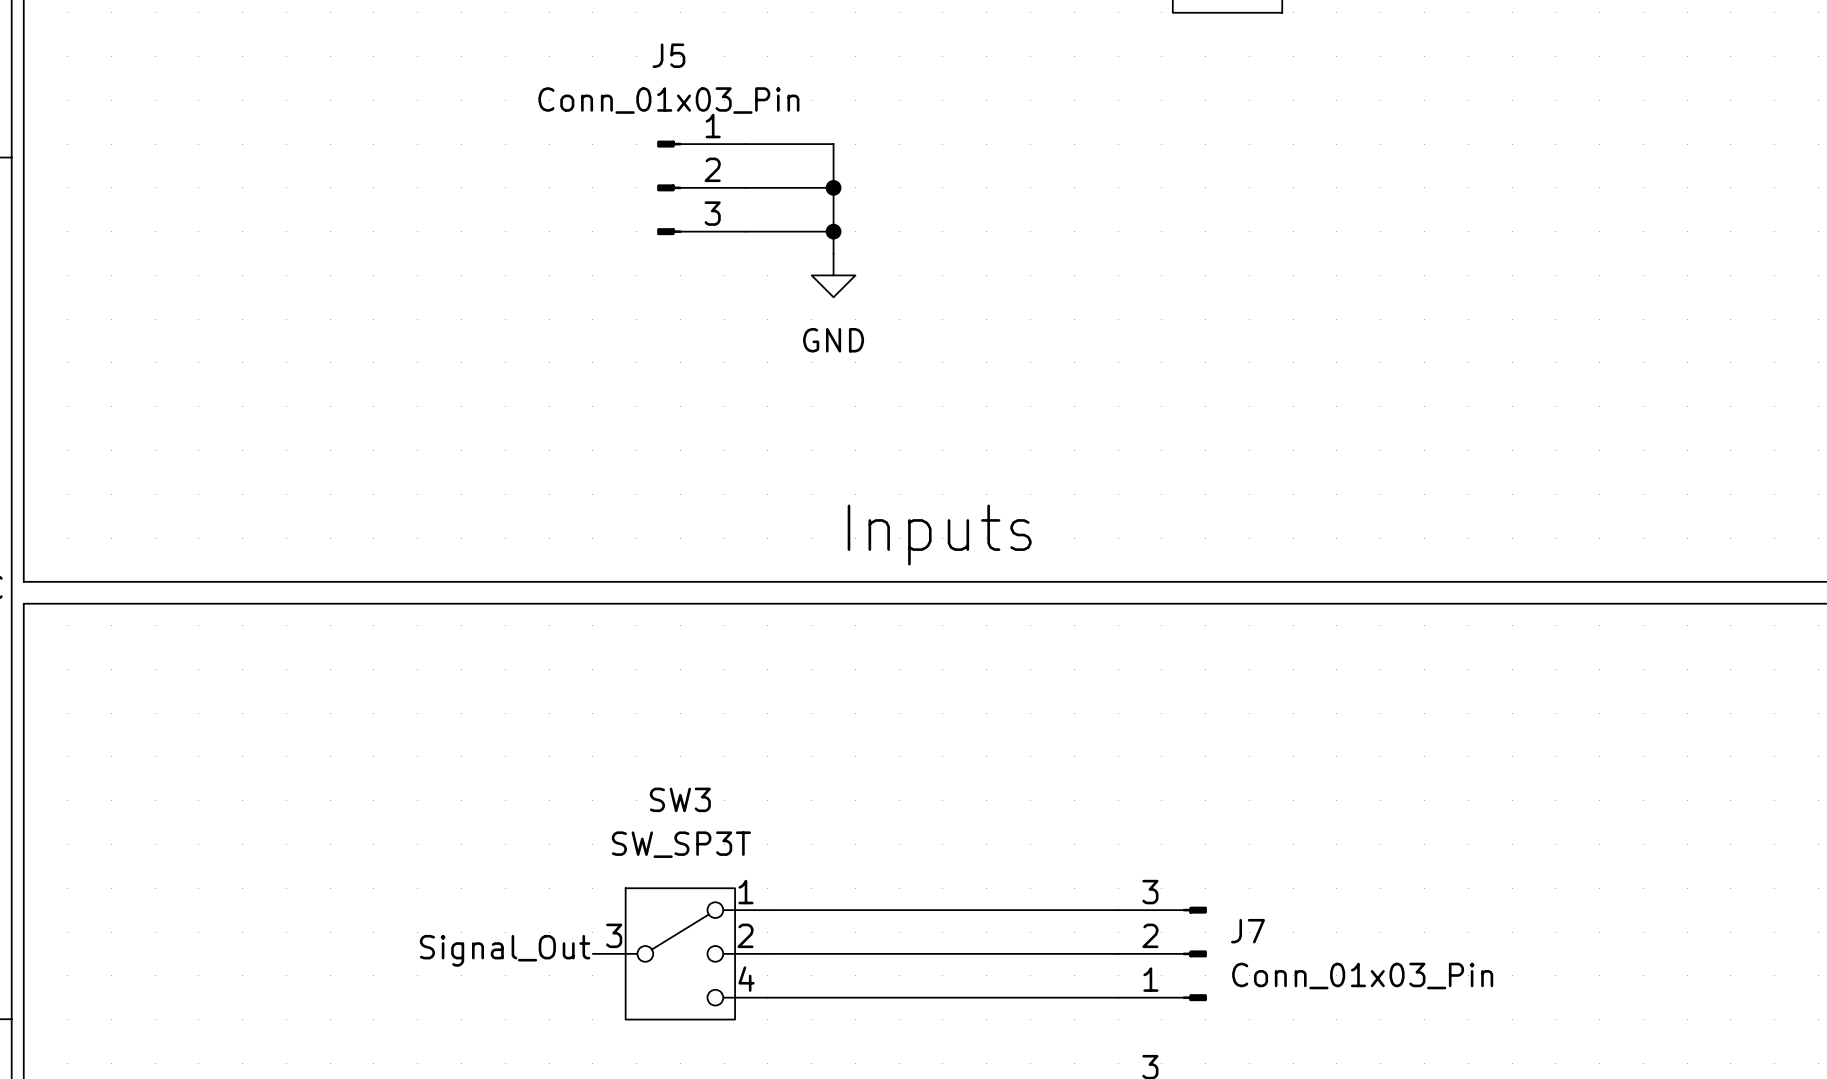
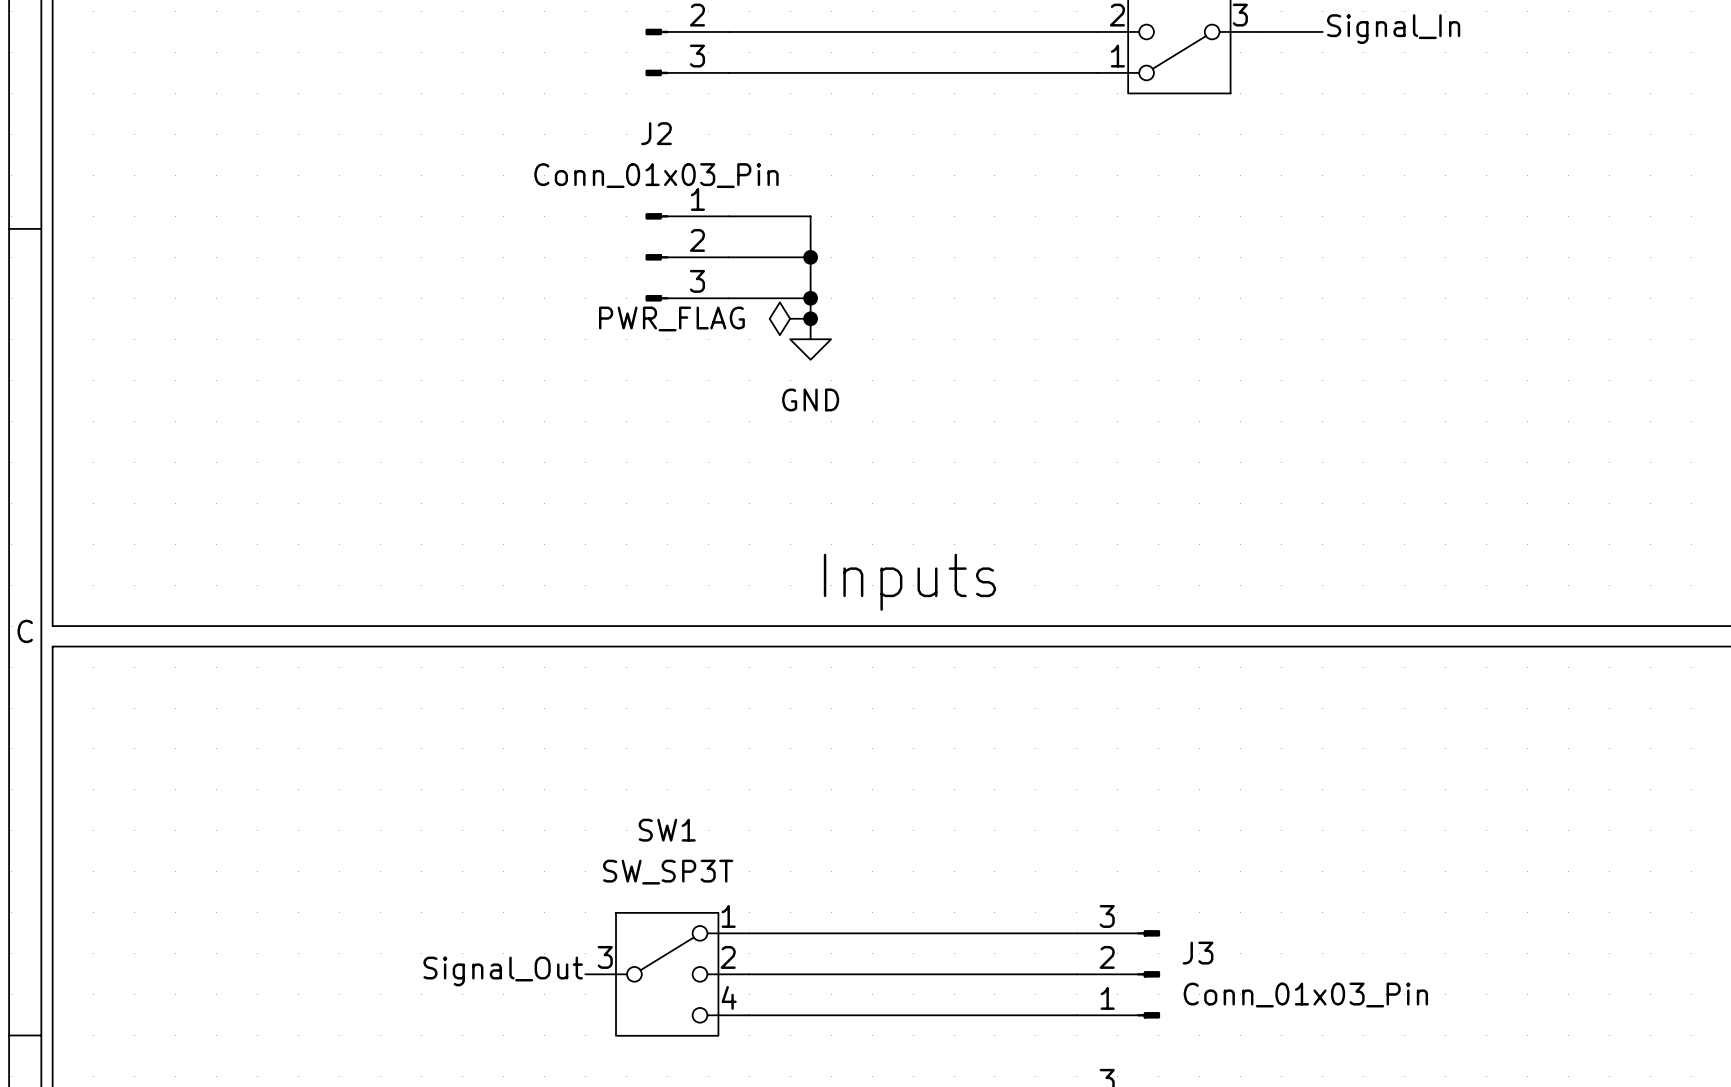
J5 name: J5 (668, 55) -> J2 (656, 133)
power symbol: none -> PWR_FLAG (790, 318)
junction: none -> (810, 318)
SW3 name: SW3 (680, 799) -> SW1 (667, 830)
J7 name: J7 (1248, 931) -> J3 (1198, 953)

